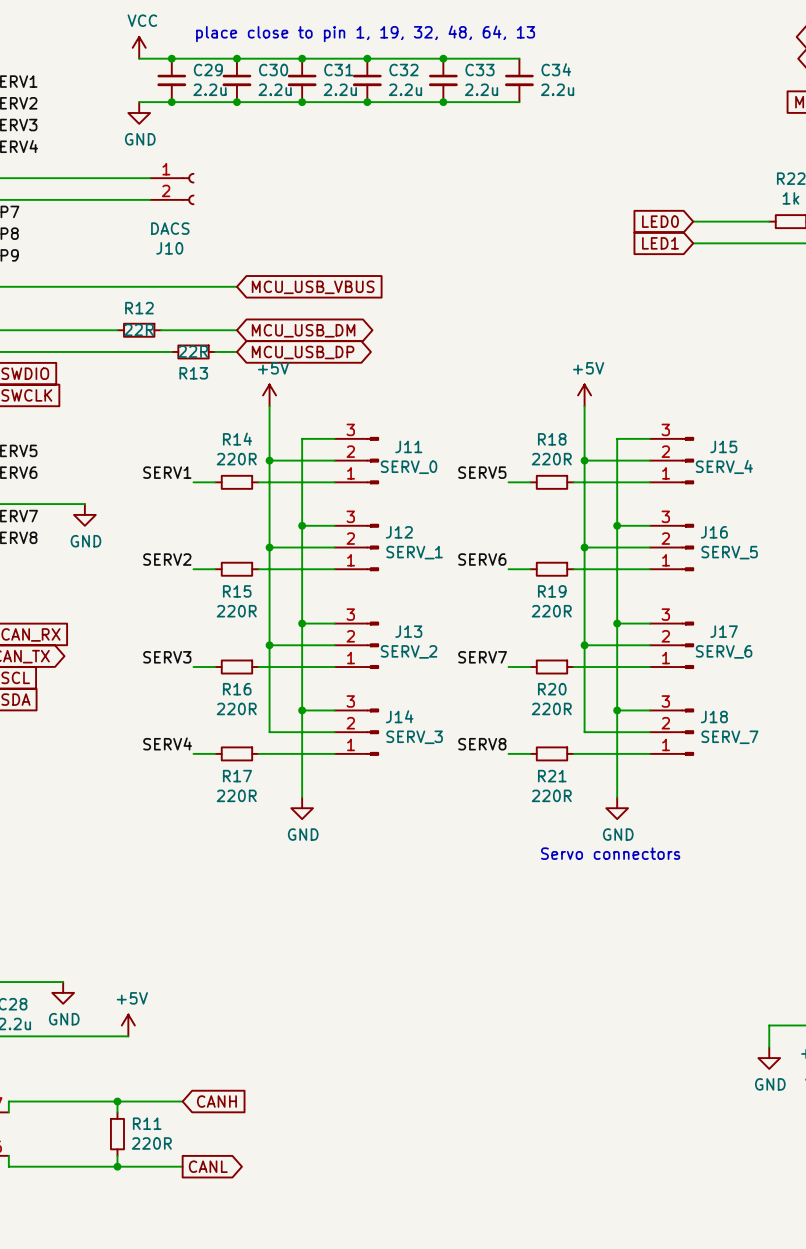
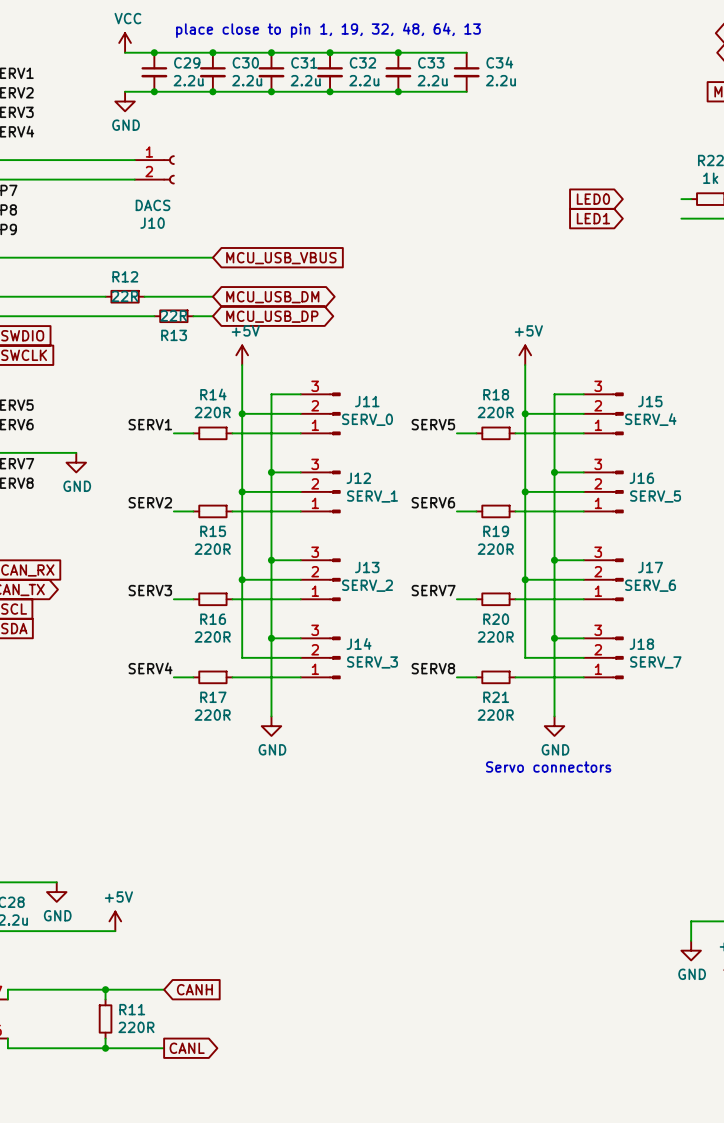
wire: (693, 221) (758, 221) -> none
wire: (693, 243) (758, 243) -> none

